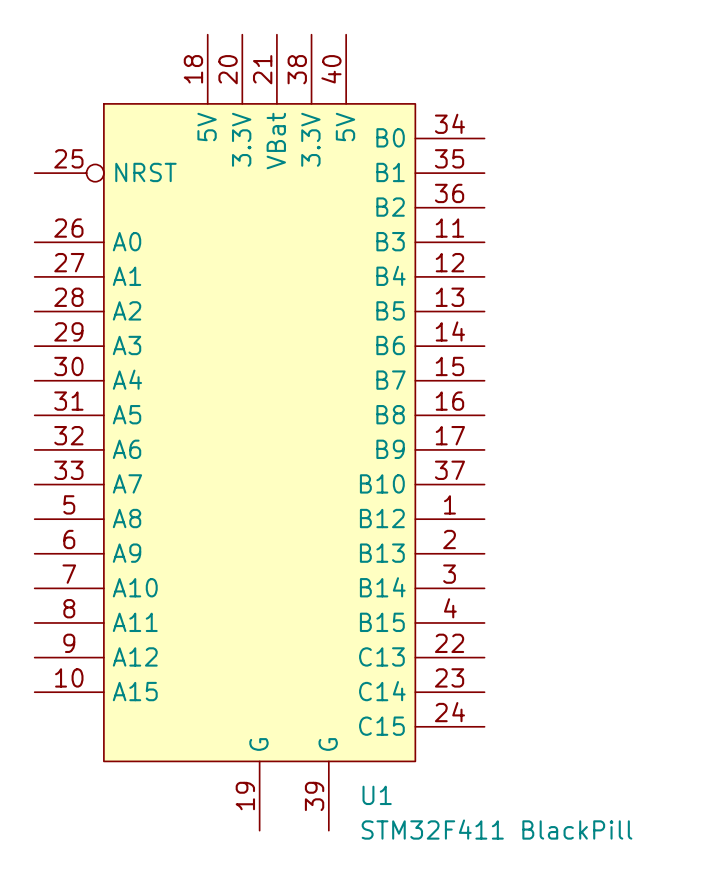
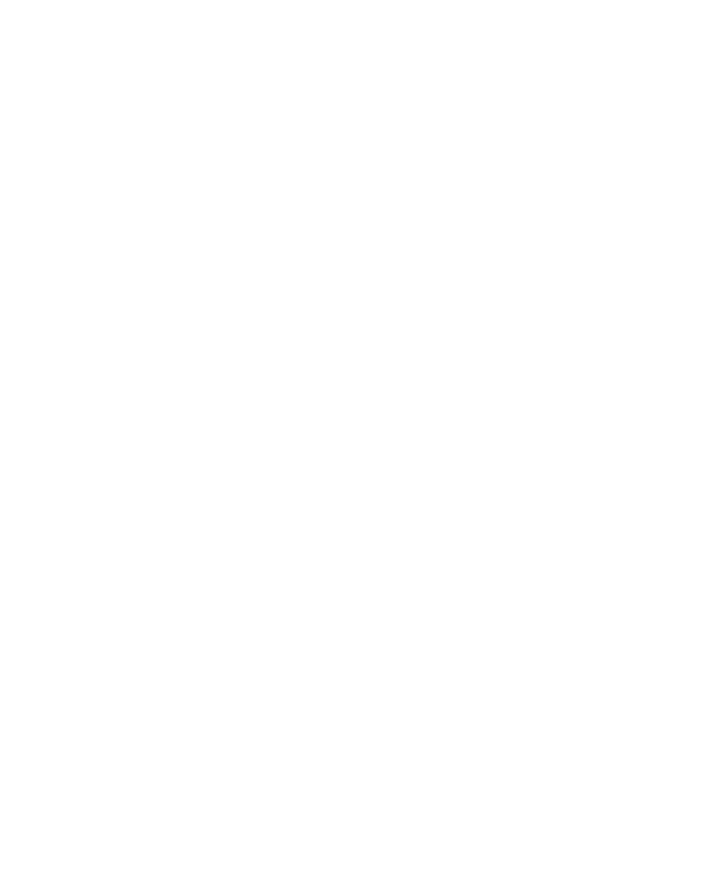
U1: STM32F411 BlackPill (259, 432) -> none

